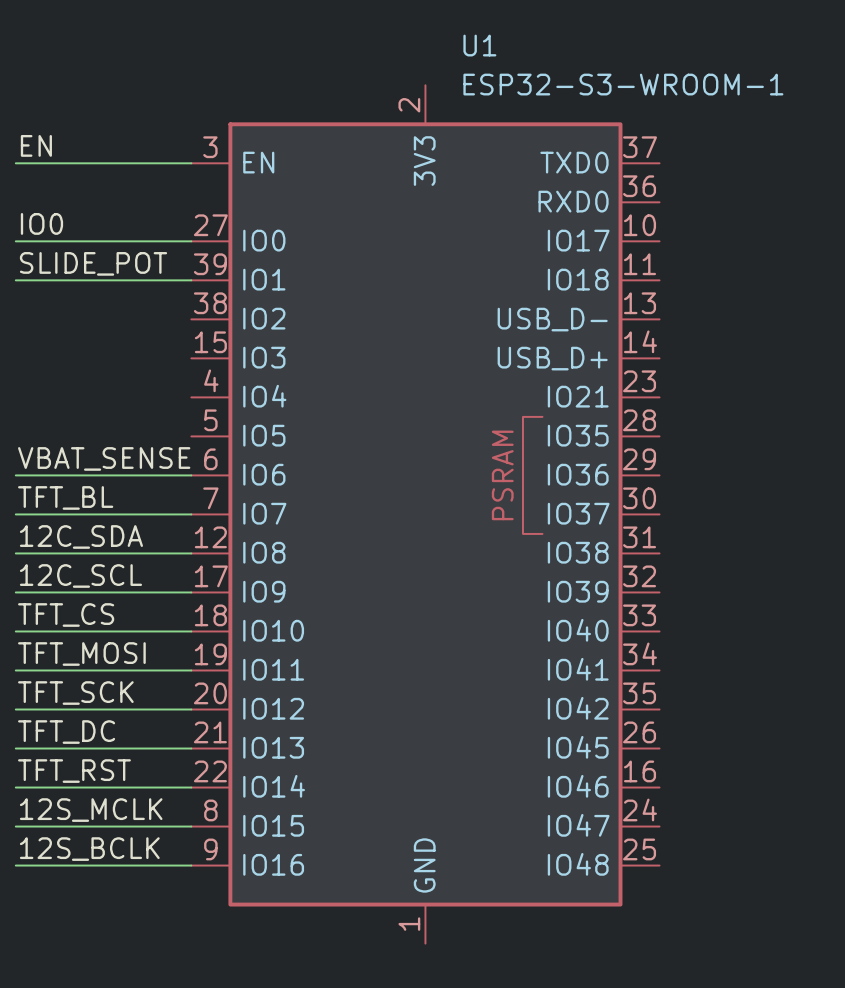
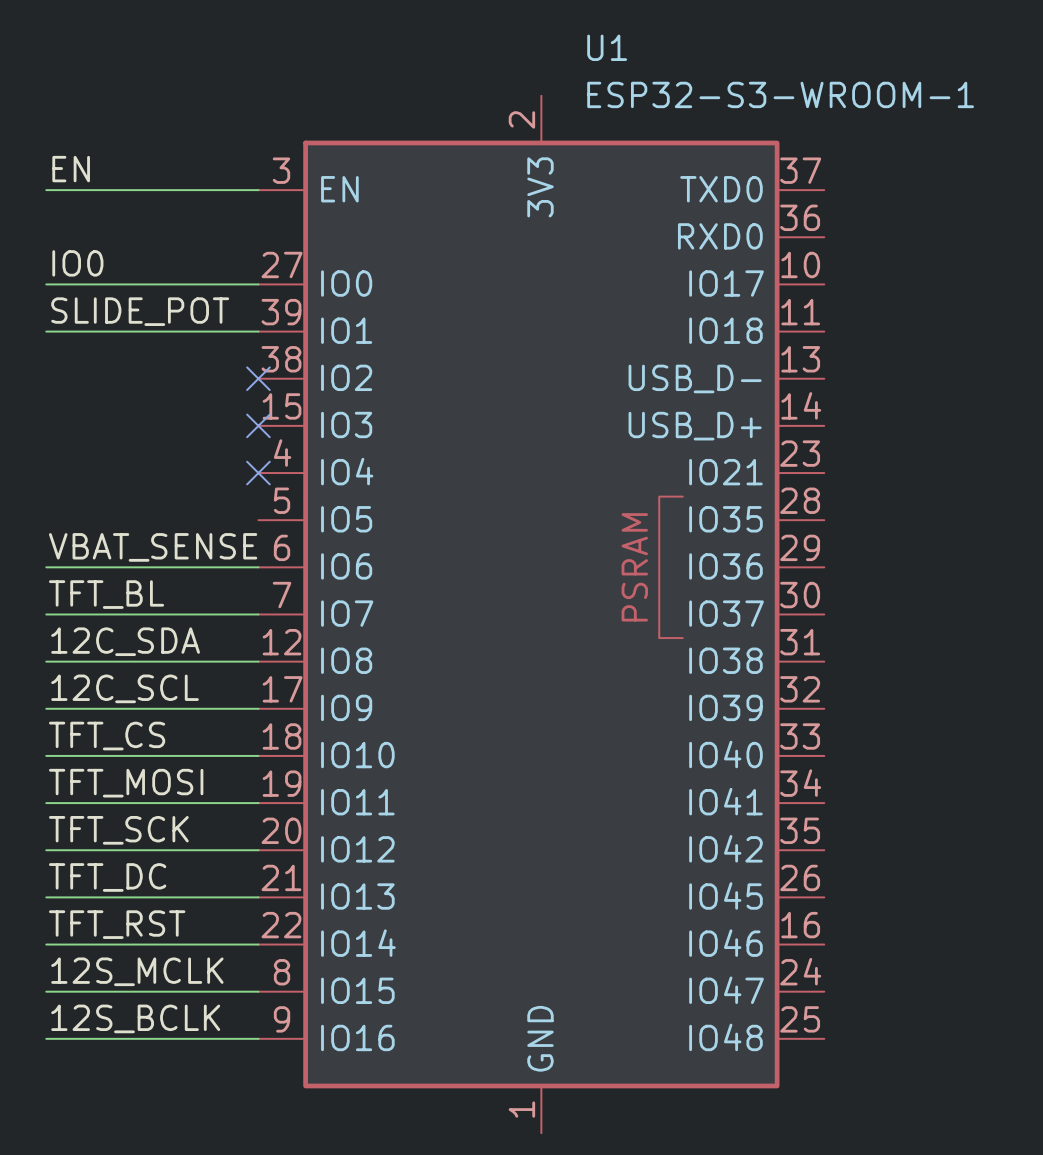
no-connect mark: none -> (258, 378)
no-connect mark: none -> (258, 425)
no-connect mark: none -> (258, 473)

